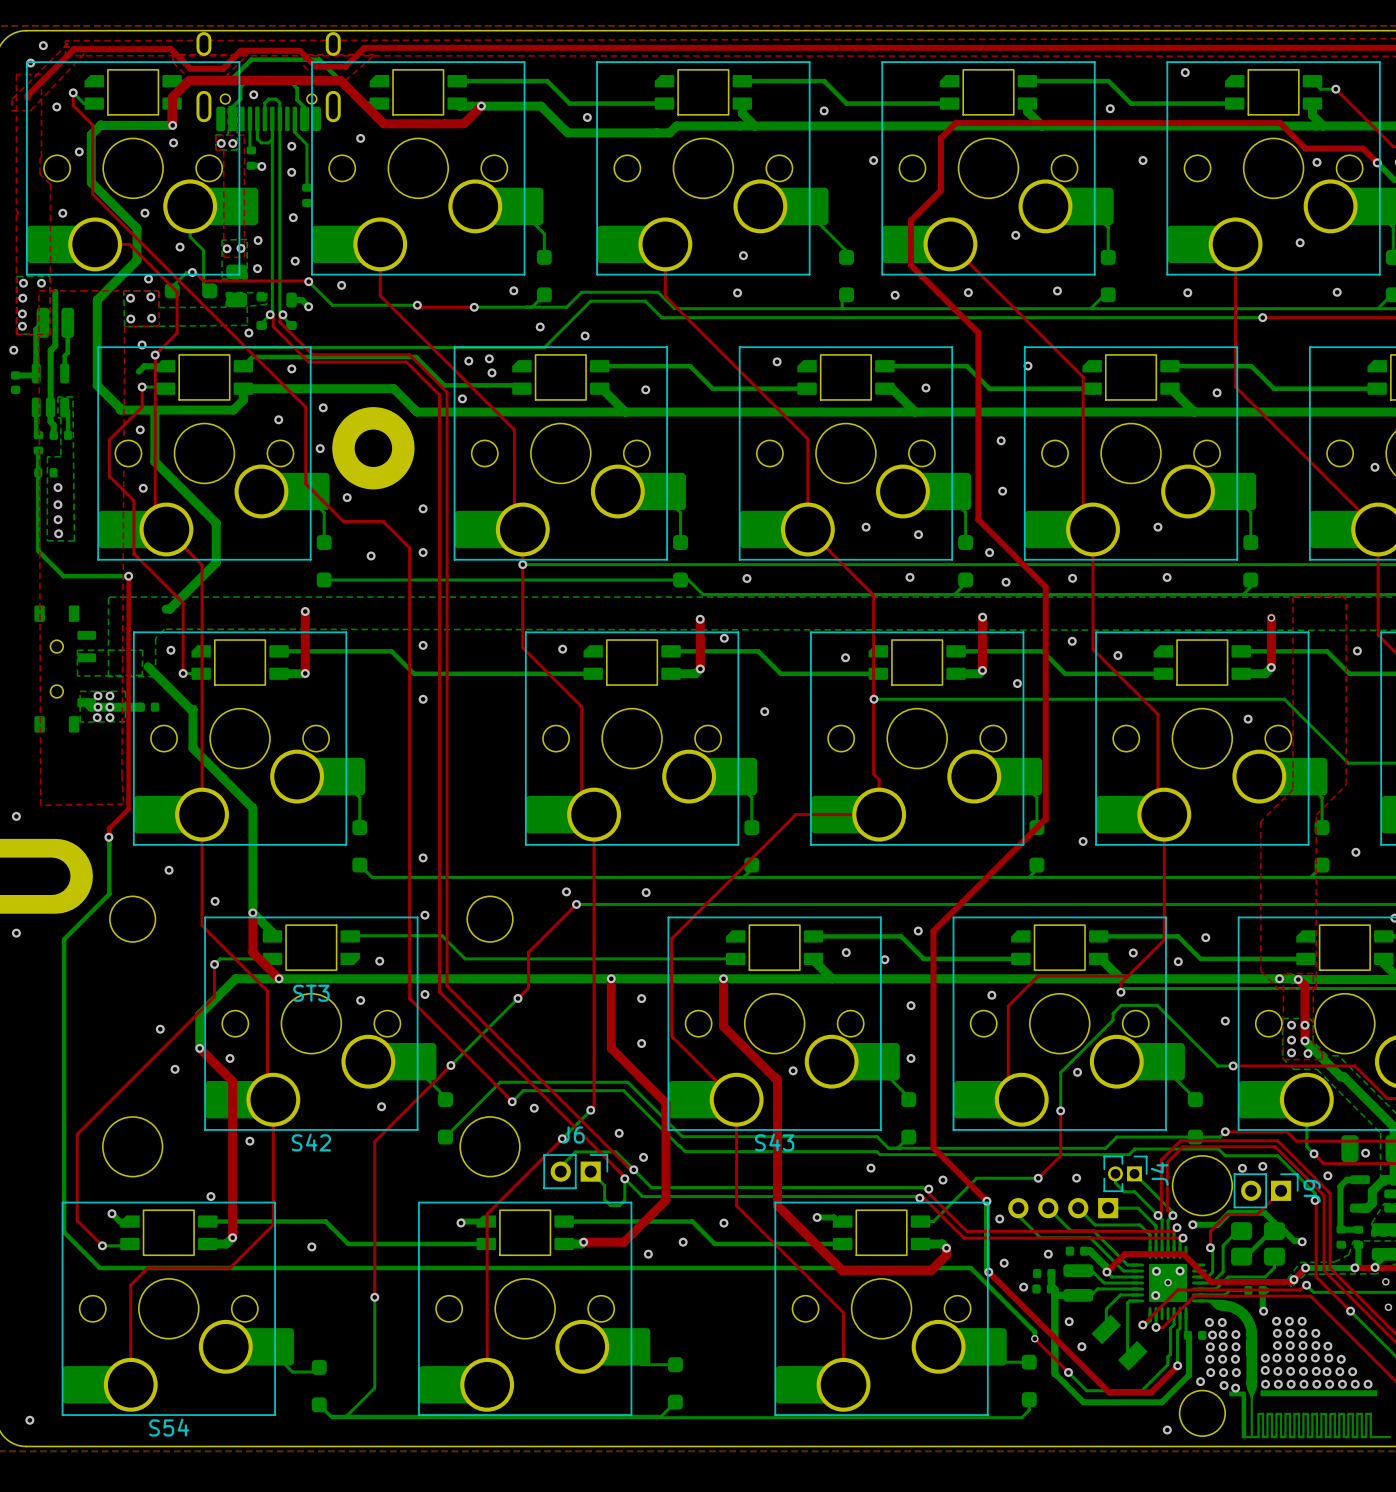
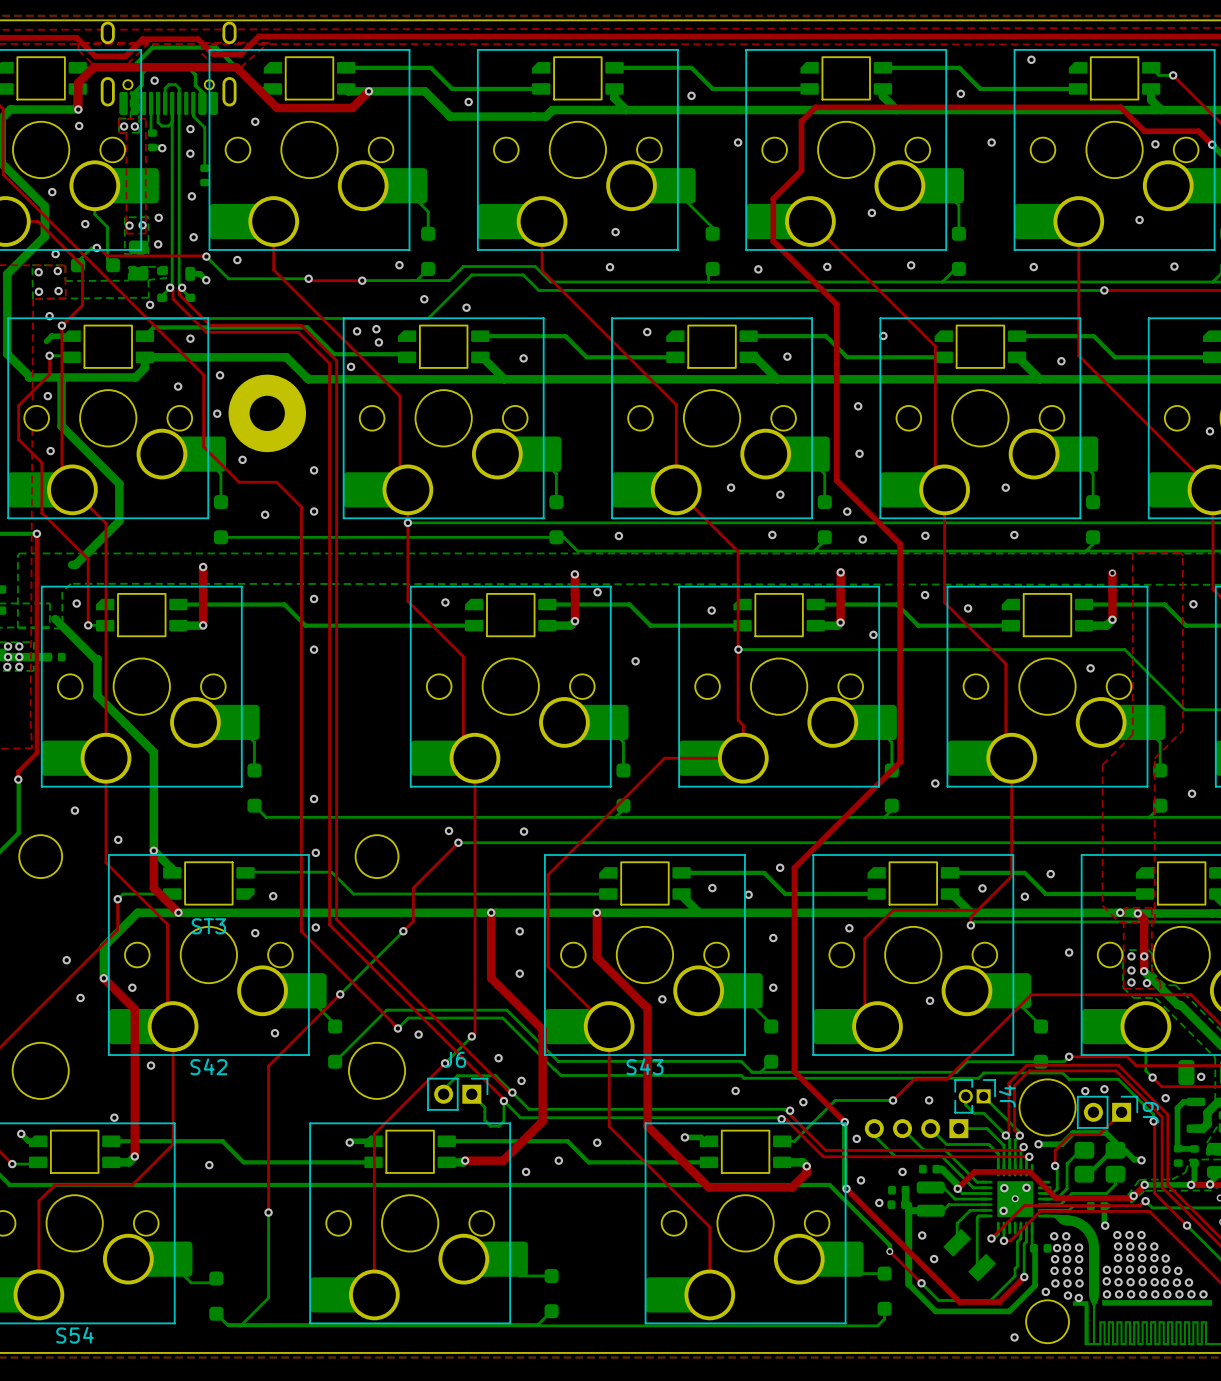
bottom track: (1233, 1065) (1217, 1065) (1157, 1005) (1121, 1005) (1113, 1013) (1113, 1020) (1060, 1072) (1060, 1110) -> none
via: (1233, 1065) -> none
top track: (1060, 1110) (1060, 1155) -> (1076, 994) (1031, 994) (946, 1079) (914, 1079)
via: (1060, 1110) -> none

